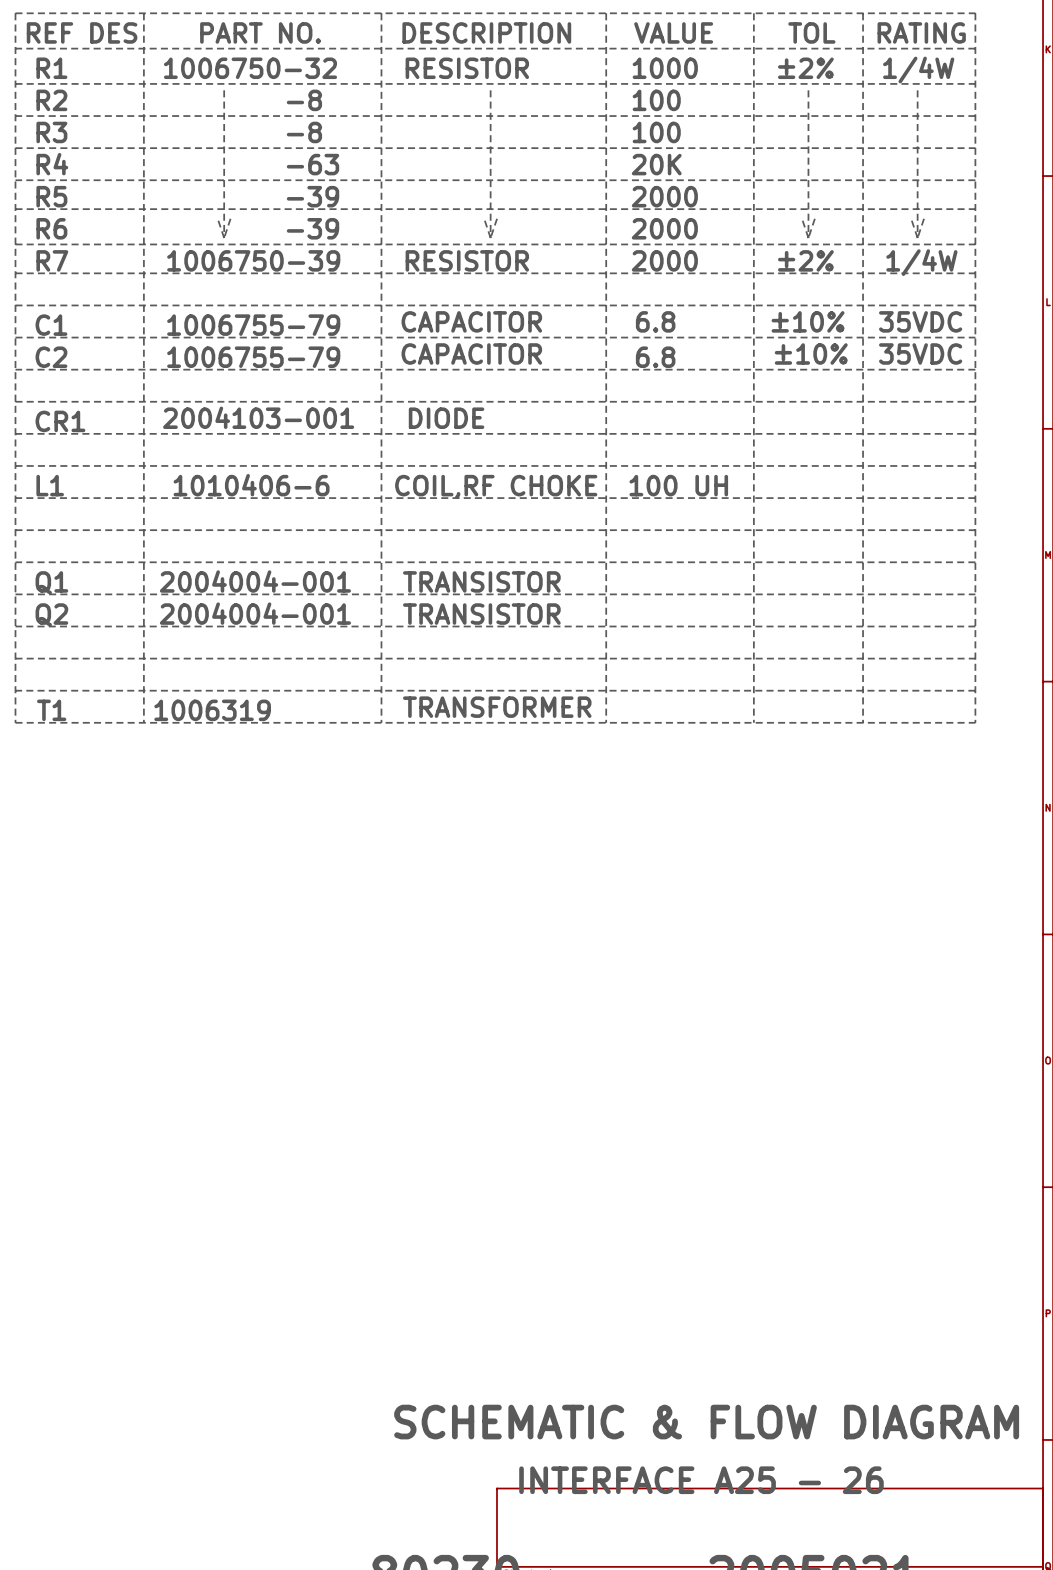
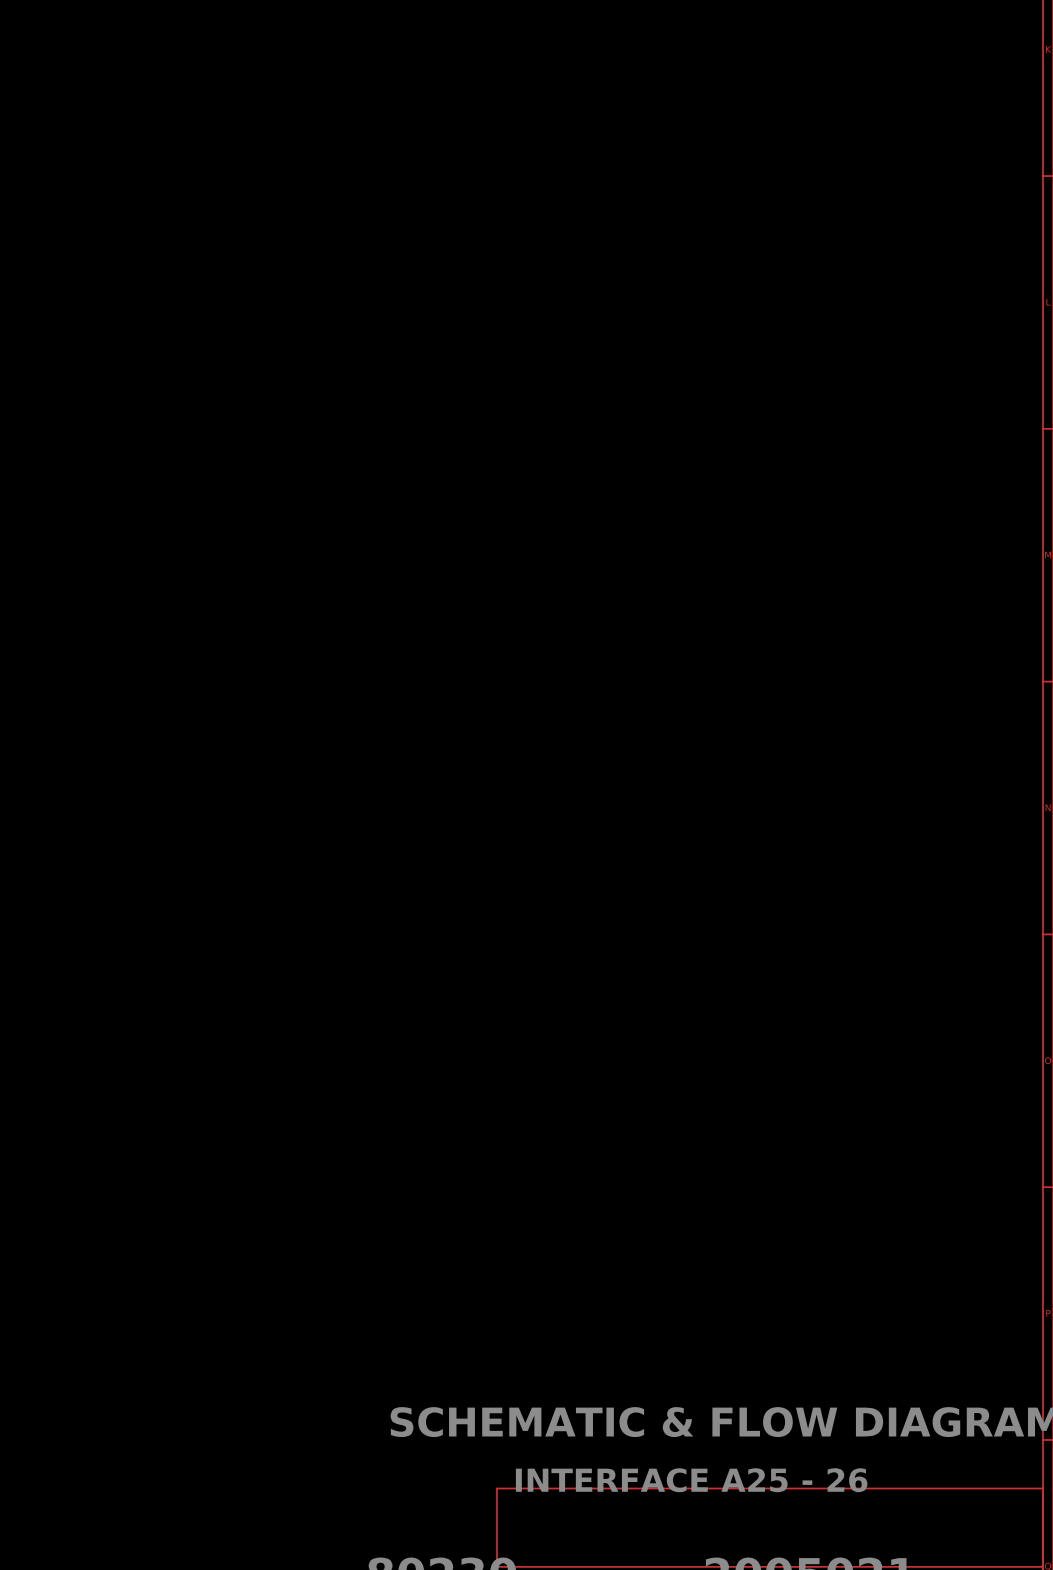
line: (15, 13) (975, 13) (975, 722) (15, 722) (15, 13) -> none
line: (143, 13) (143, 722) -> none
line: (381, 13) (381, 722) -> none
line: (606, 13) (606, 722) -> none
line: (753, 13) (753, 722) -> none
line: (863, 13) (863, 722) -> none
text: REF DES (82, 32) -> none
text: PART NO. (260, 32) -> none
text: DESCRIPTION (486, 32) -> none
text: VALUE (673, 32) -> none
text: TOL (811, 32) -> none
text: RATING (921, 32) -> none
line: (15, 48) (975, 48) -> none
text: R1 (51, 68) -> none
text: 1006750-32 (250, 68) -> none
text: RESISTOR (467, 68) -> none
text: 1000 (665, 68) -> none
text: ±2% (805, 68) -> none
text: 1/4W (918, 69) -> none
line: (15, 83) (975, 83) -> none
line: (224, 90) (224, 238) -> none
line: (490, 90) (490, 238) -> none
line: (808, 90) (808, 238) -> none
line: (917, 90) (917, 238) -> none
text: R2 (51, 100) -> none
text: -8 (304, 100) -> none
text: 100 (656, 100) -> none
line: (15, 116) (975, 116) -> none
text: R3 (51, 132) -> none
text: -8 (304, 132) -> none
text: 100 (656, 132) -> none
line: (15, 148) (975, 148) -> none
text: R4 (52, 164) -> none
text: -63 (312, 164) -> none
text: 20K (656, 164) -> none
line: (15, 180) (975, 180) -> none
text: R5 (51, 196) -> none
text: -39 (312, 196) -> none
text: 2000 (664, 196) -> none
line: (15, 209) (975, 209) -> none
line: (217, 218) (224, 238) -> none
line: (230, 218) (224, 238) -> none
line: (484, 218) (490, 238) -> none
line: (497, 218) (490, 238) -> none
line: (802, 218) (808, 238) -> none
line: (814, 218) (808, 238) -> none
line: (911, 218) (917, 238) -> none
line: (924, 218) (917, 238) -> none
text: R6 (51, 228) -> none
text: -39 (312, 228) -> none
text: 2000 (664, 228) -> none
line: (15, 244) (975, 244) -> none
text: R7 (52, 260) -> none
text: 1006750-39 (253, 260) -> none
text: RESISTOR (467, 260) -> none
text: 2000 (664, 260) -> none
text: ±2% (805, 260) -> none
text: 1/4W (921, 262) -> none
line: (15, 273) (975, 273) -> none
line: (15, 305) (975, 305) -> none
text: CAPACITOR (471, 321) -> none
text: 6.8 (655, 321) -> none
text: ±10% (808, 321) -> none
text: 35VDC (920, 321) -> none
text: C1 (51, 325) -> none
text: 1006755-79 (253, 325) -> none
line: (15, 337) (975, 337) -> none
text: CAPACITOR (471, 353) -> none
text: ±10% (811, 353) -> none
text: 35VDC (920, 353) -> none
text: C2 (51, 357) -> none
text: 1006755-79 (253, 357) -> none
text: 6.8 (655, 357) -> none
line: (15, 369) (975, 369) -> none
line: (15, 401) (975, 401) -> none
text: 2004103-001 (258, 417) -> none
text: DIODE (446, 418) -> none
text: CR1 (60, 421) -> none
line: (15, 433) (975, 433) -> none
line: (15, 465) (975, 465) -> none
text: L1 (50, 485) -> none
text: 1010406-6 (251, 485) -> none
text: 100 UH (678, 485) -> none
text: COIL,RF CHOKE (496, 486) -> none
line: (15, 498) (975, 498) -> none
line: (15, 530) (975, 530) -> none
line: (15, 562) (975, 562) -> none
text: 2004004-001 (255, 581) -> none
text: TRANSISTOR (481, 581) -> none
text: Q1 (51, 582) -> none
line: (15, 594) (975, 594) -> none
text: 2004004-001 (255, 613) -> none
text: Q2 (51, 614) -> none
text: TRANSISTOR (481, 614) -> none
line: (15, 626) (975, 626) -> none
line: (15, 658) (975, 658) -> none
line: (15, 690) (975, 690) -> none
text: TRANSFORMER (497, 707) -> none
text: T1 (51, 710) -> none
text: 1006319 (212, 710) -> none

